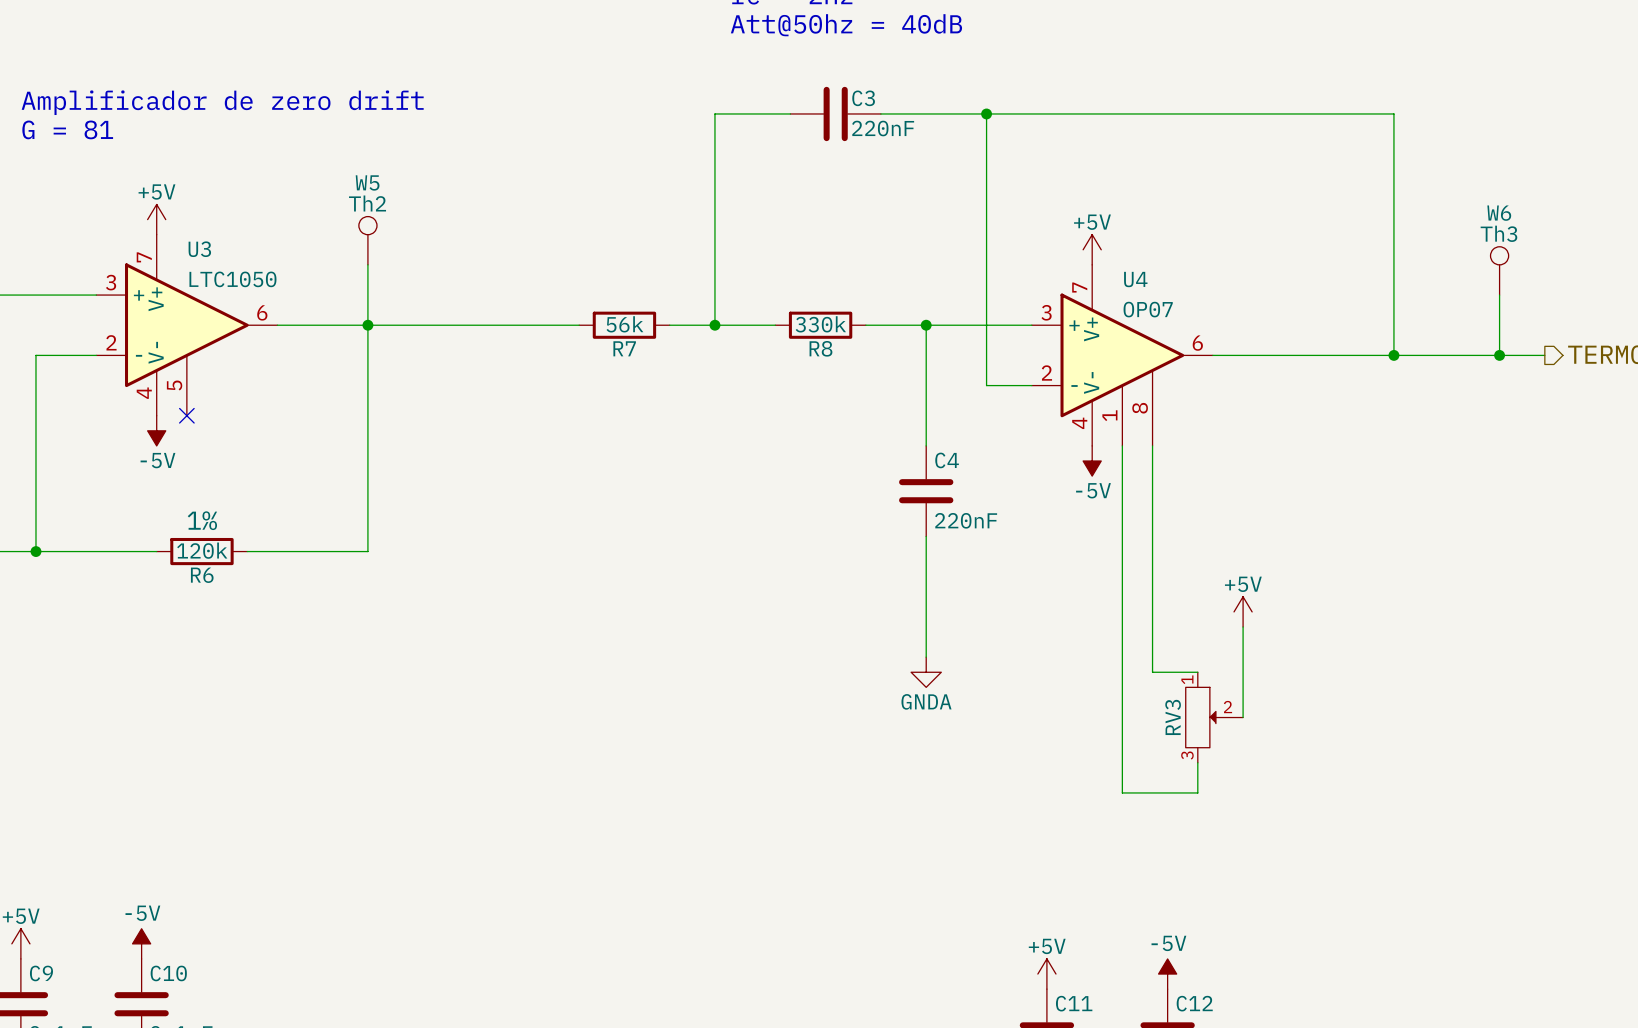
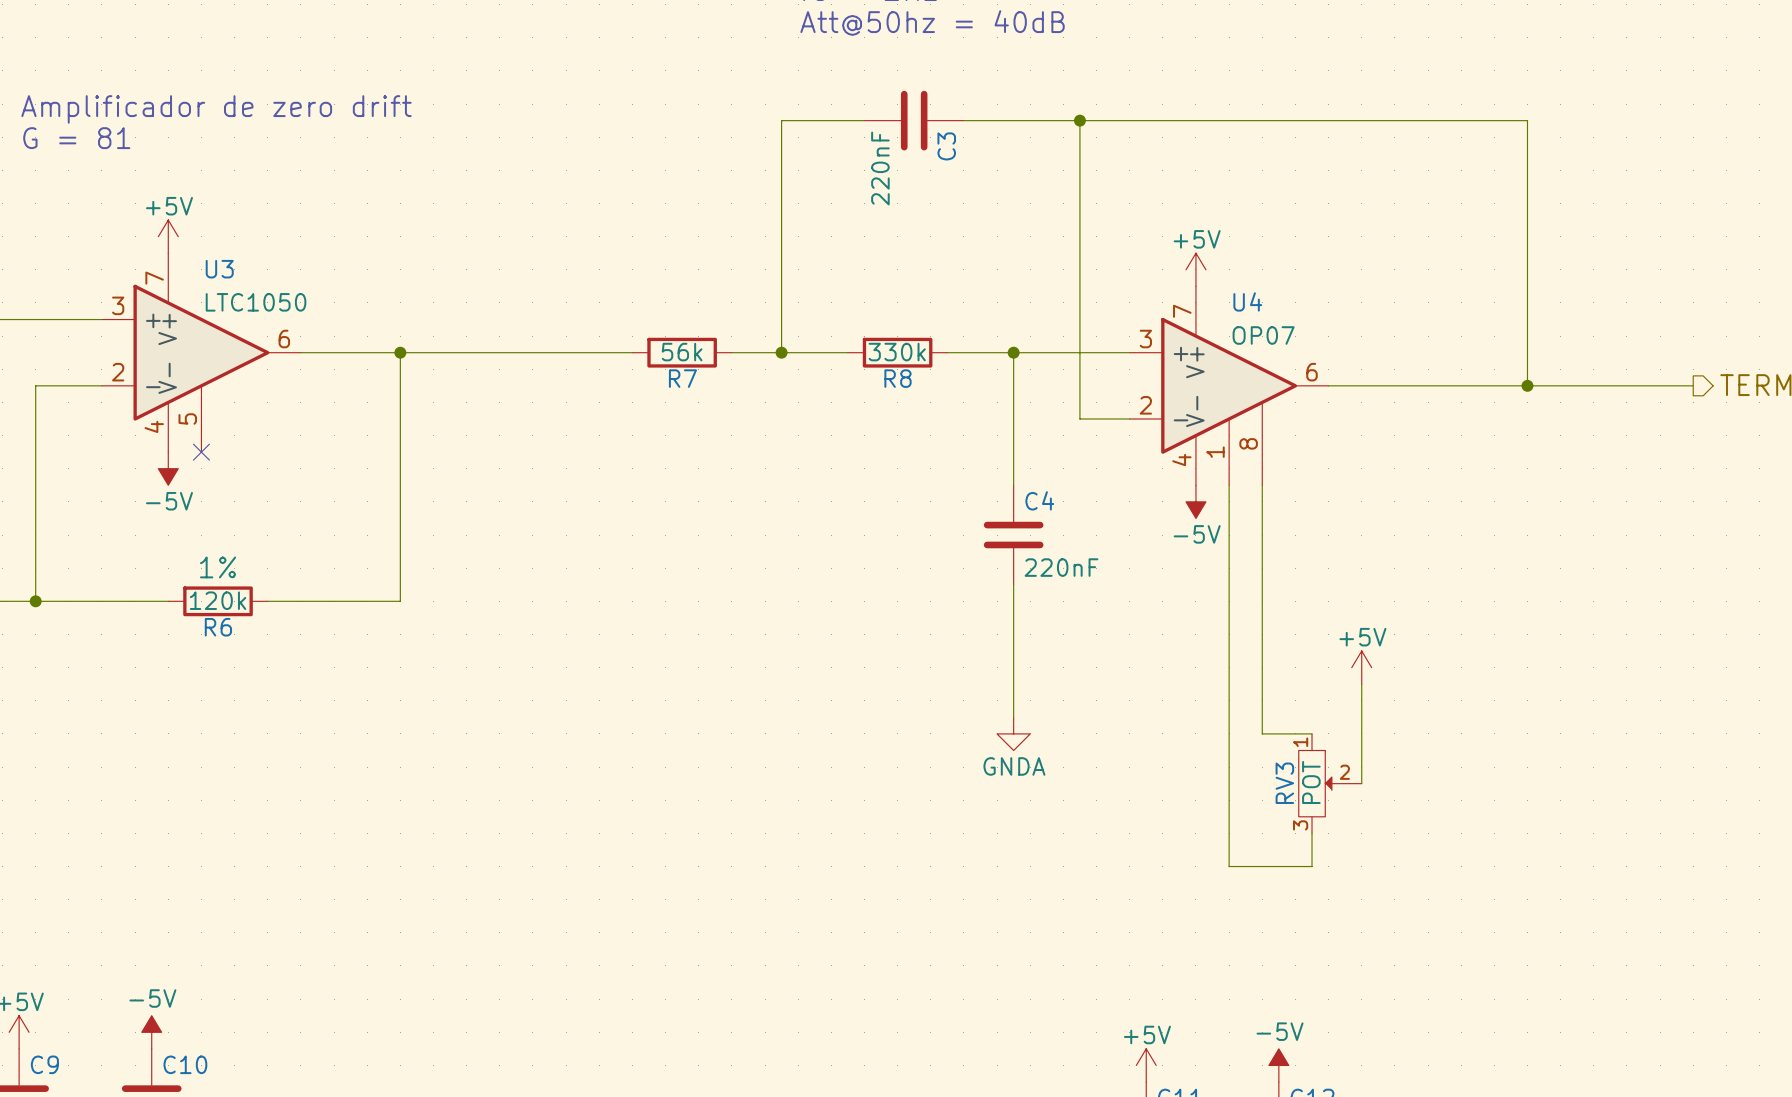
C3 name rotation: 0° (863, 98) -> 90° counterclockwise (946, 146)
C3 name position: C3 (863, 98) -> C3 (946, 146)
C3 value rotation: 0° (883, 128) -> 90° counterclockwise (880, 168)
C3 value position: 220nF (883, 128) -> 220nF (880, 168)
W5: Th2 (367, 240) -> none
wire: (367, 264) (367, 325) -> none
W6: Th3 (1499, 270) -> none
wire: (1499, 295) (1499, 355) -> none
junction: (1499, 355) -> none
RV3 value: none -> POT (1311, 782)

